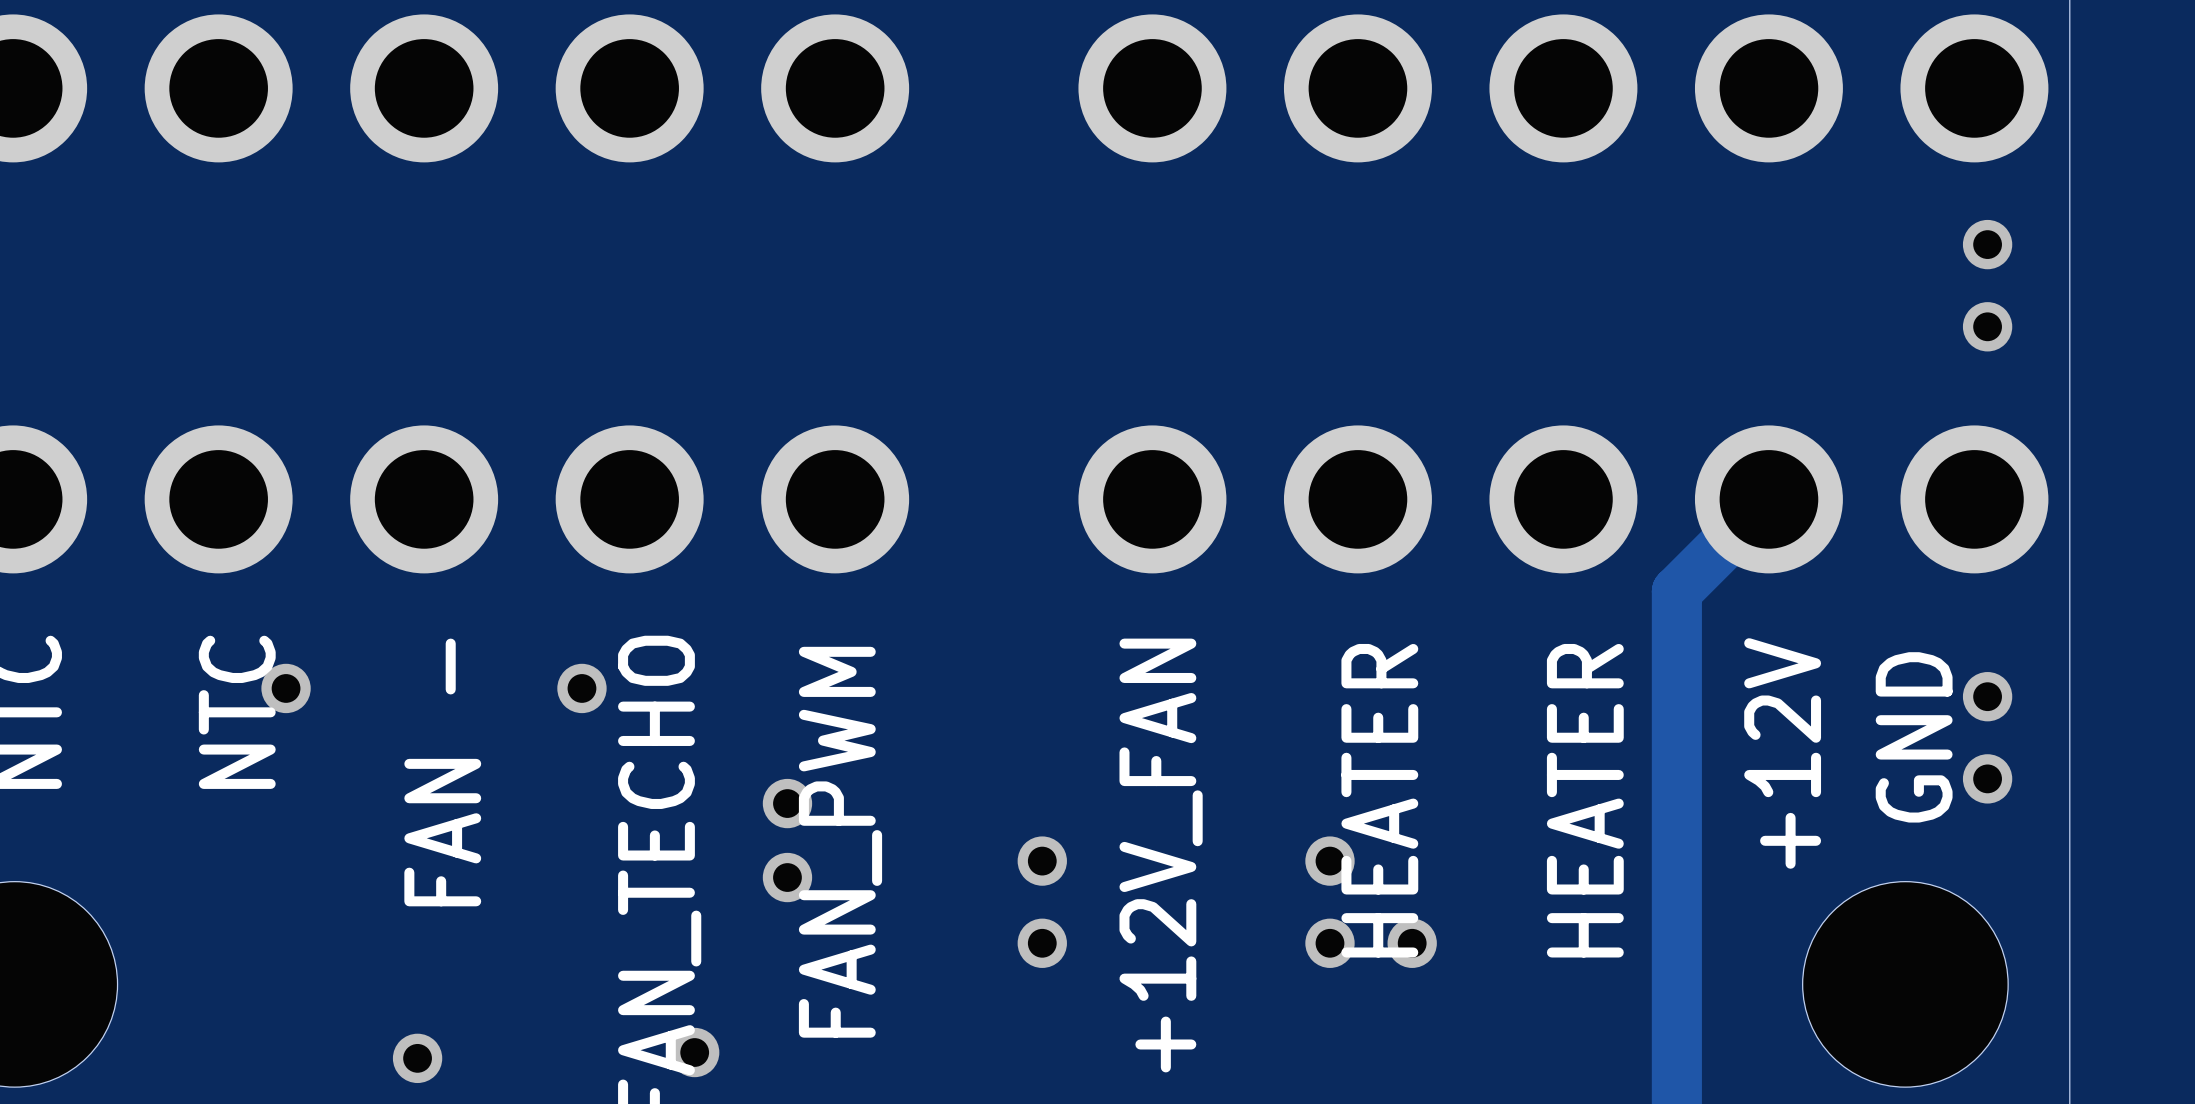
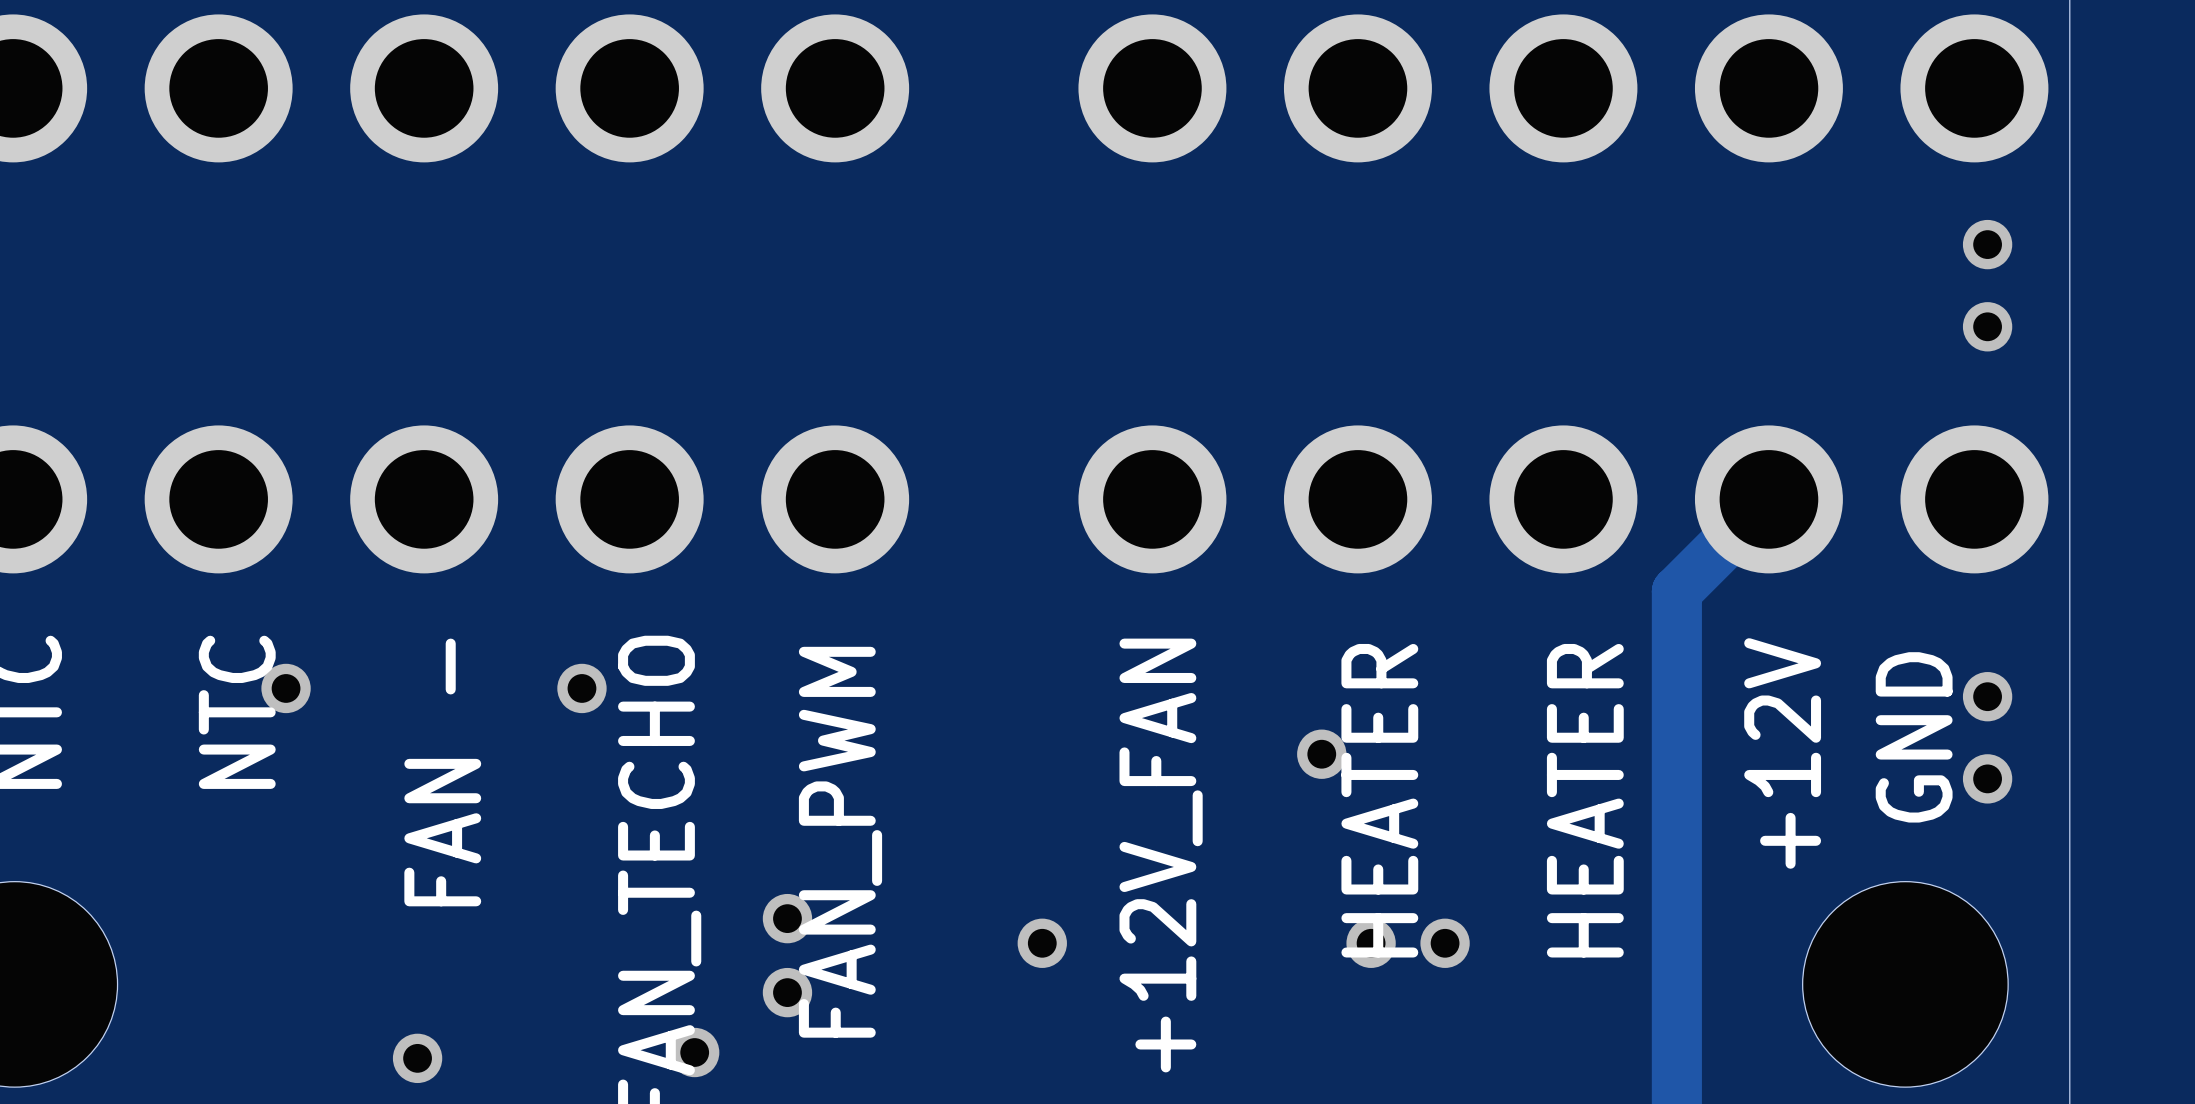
via: none -> (1321, 754)
via: (787, 803) -> none
via: (1042, 861) -> none
via: (1329, 861) -> none
via position: (787, 877) -> (787, 918)
via: (1329, 943) -> none
via: none -> (1371, 943)
via: (1412, 943) -> none
via: none -> (1445, 943)
via: none -> (787, 992)

